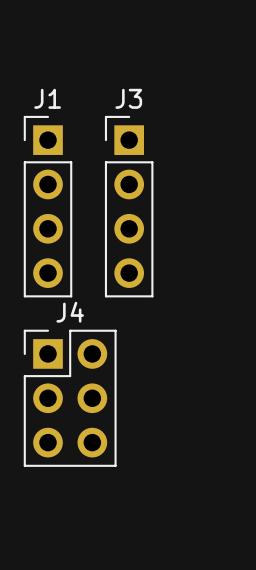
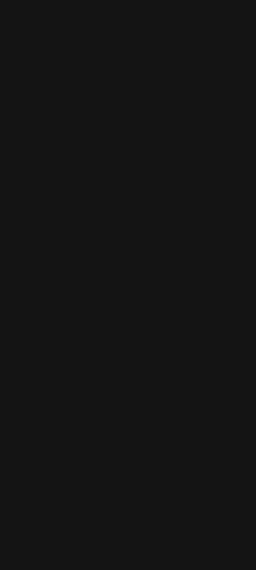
J1: (48, 206) -> none
J3: (129, 206) -> none
J4: (70, 398) -> none

